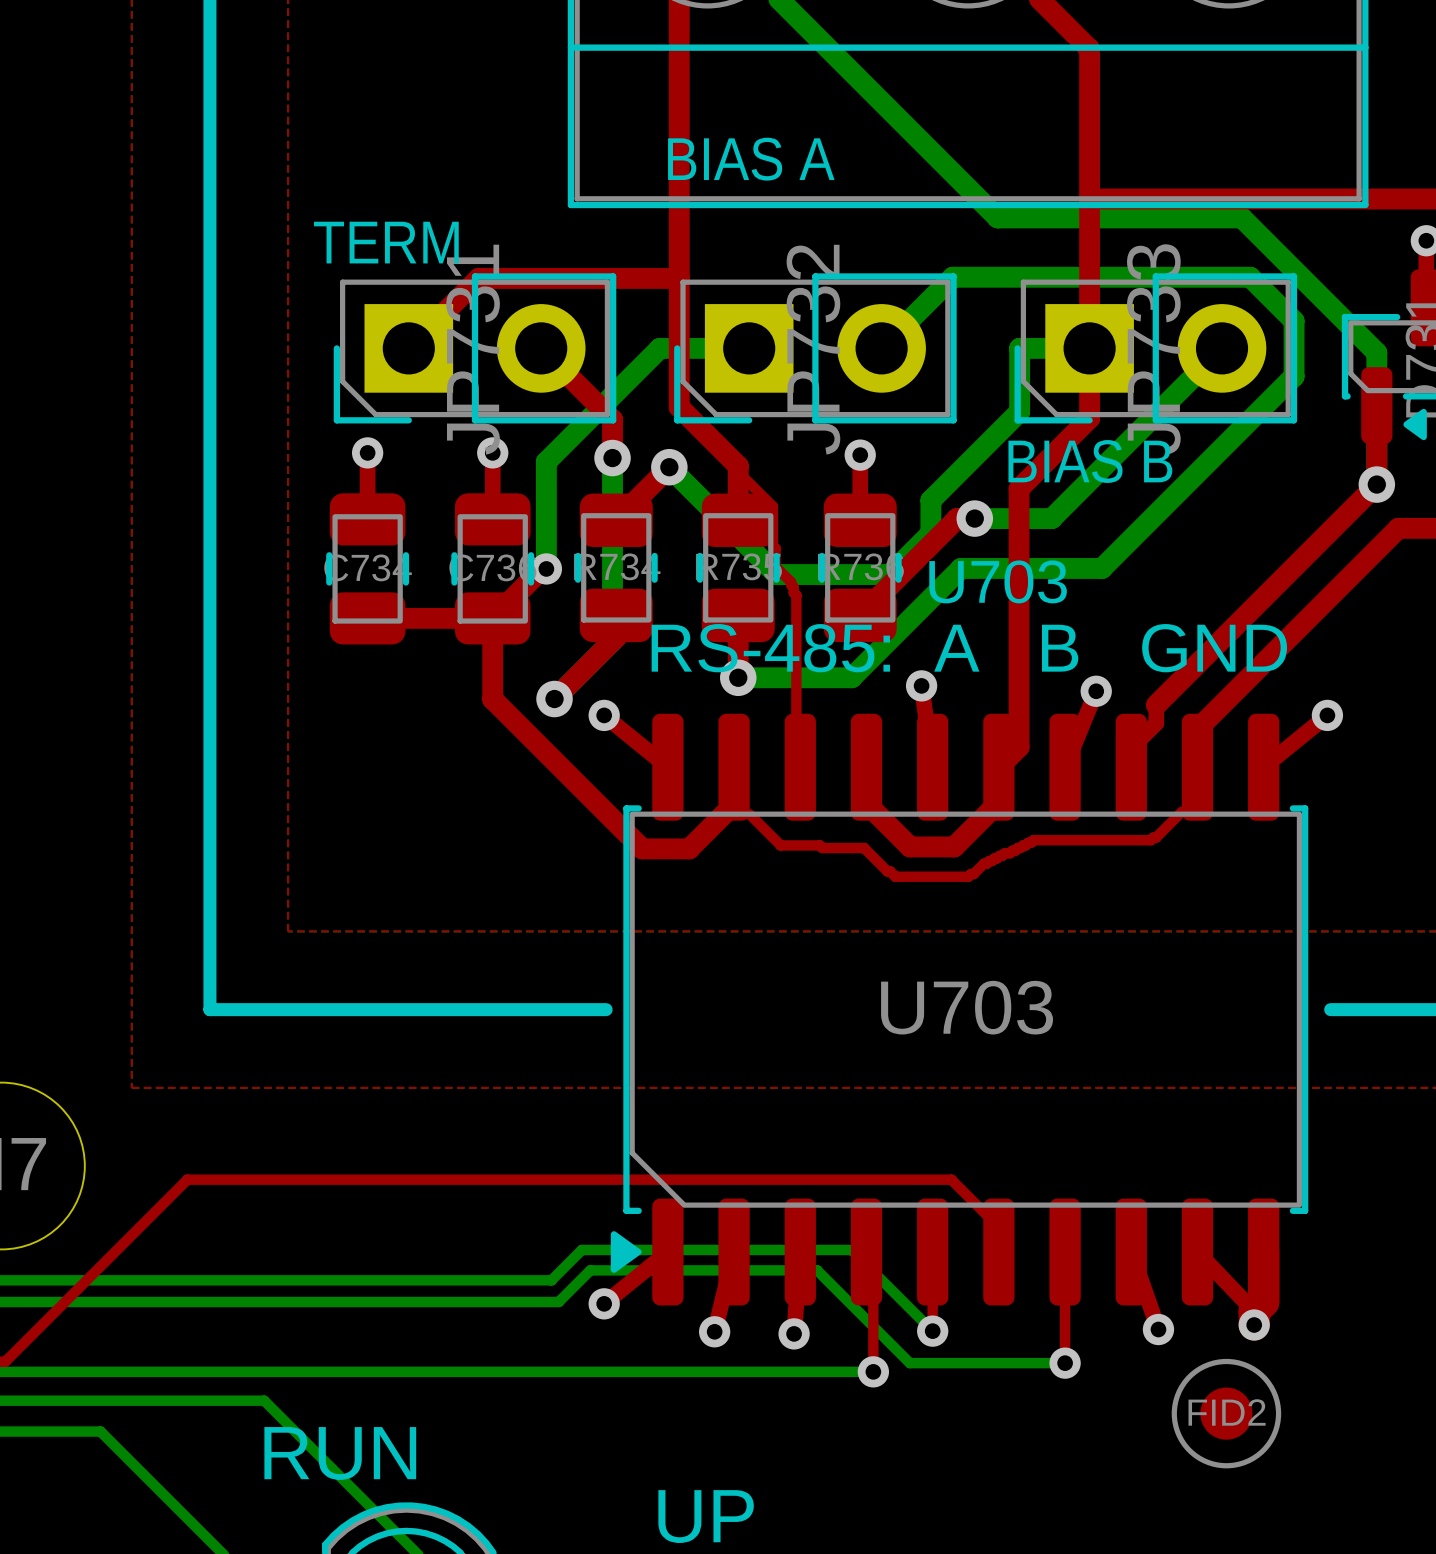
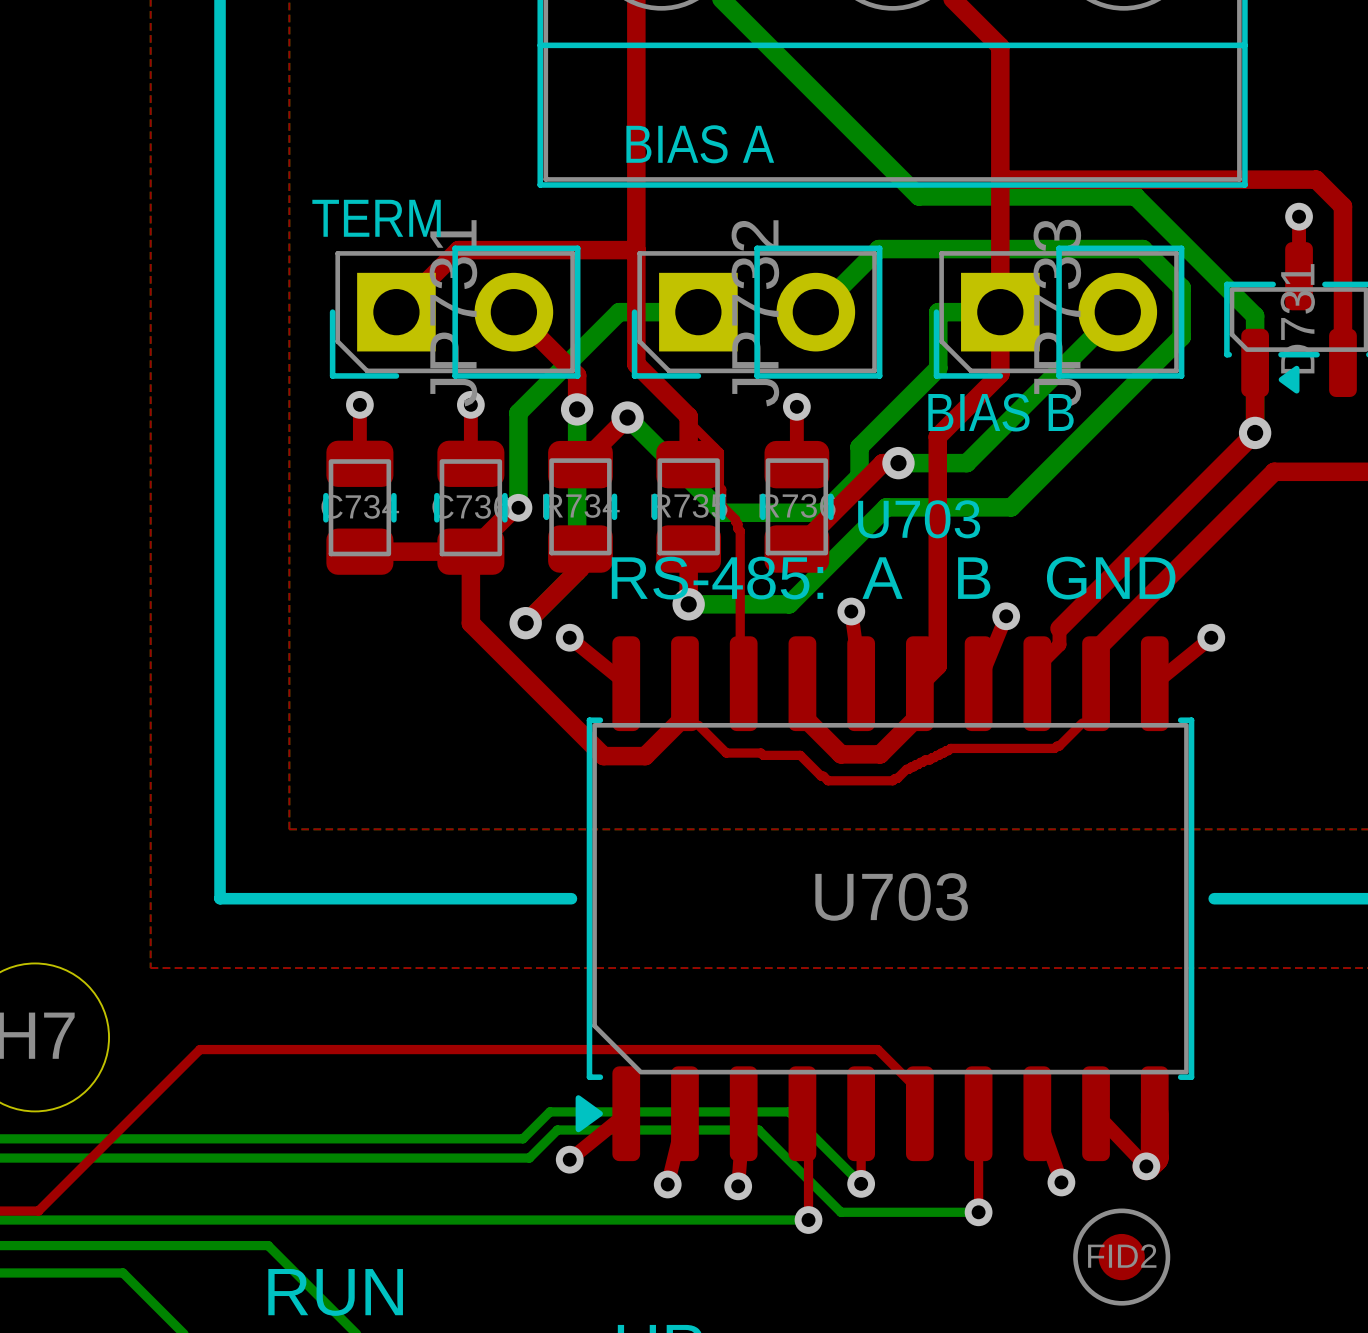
via position: (1254, 1325) -> (1146, 1166)

